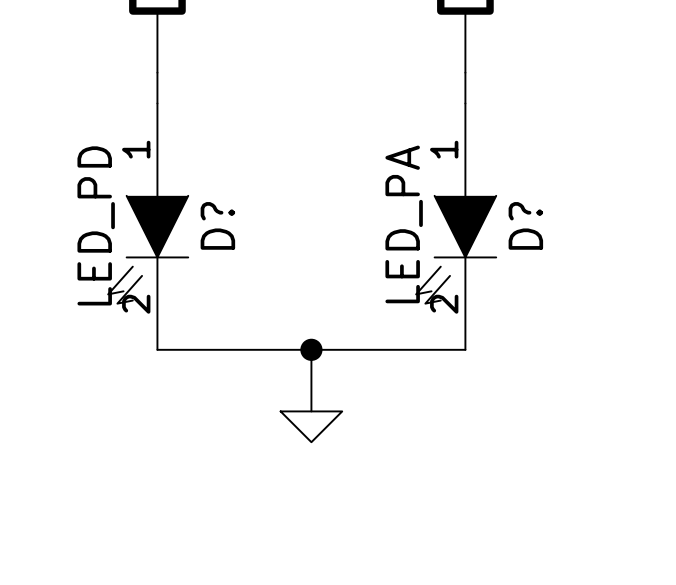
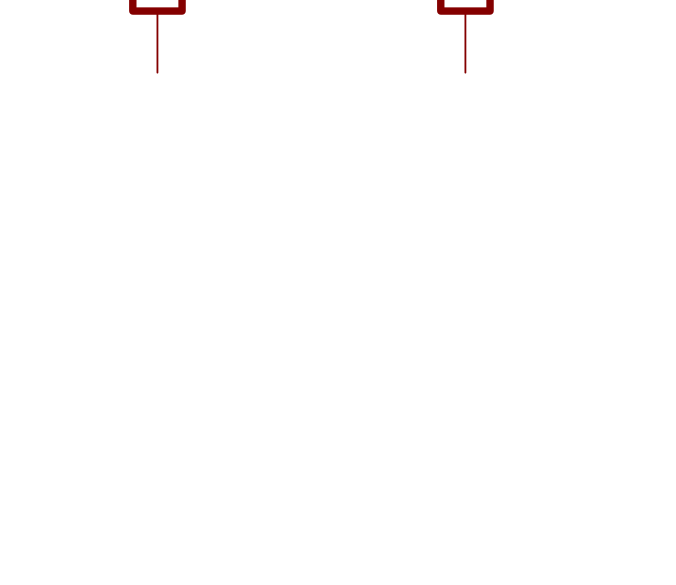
wire: (157, 72) (157, 103) -> none
wire: (465, 72) (465, 103) -> none
D?: LED_PD (148, 226) -> none
D?: LED_PA (456, 226) -> none
wire: (157, 349) (465, 349) -> none
wire: (311, 349) (311, 411) -> none
junction: (311, 349) -> none
power symbol: (311, 426) -> none

